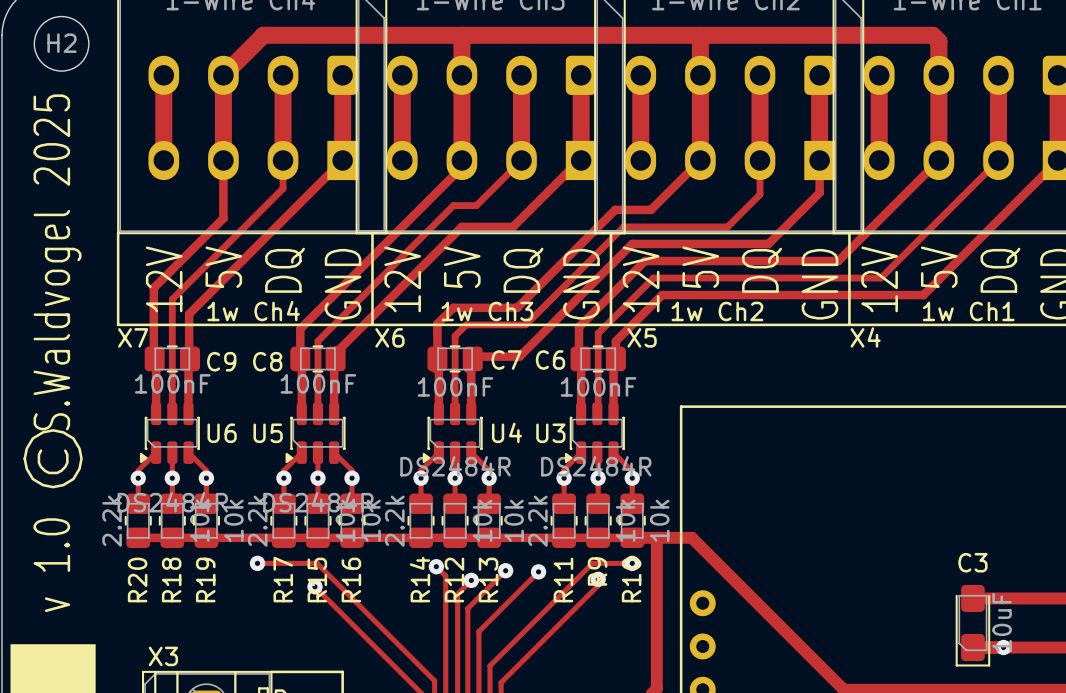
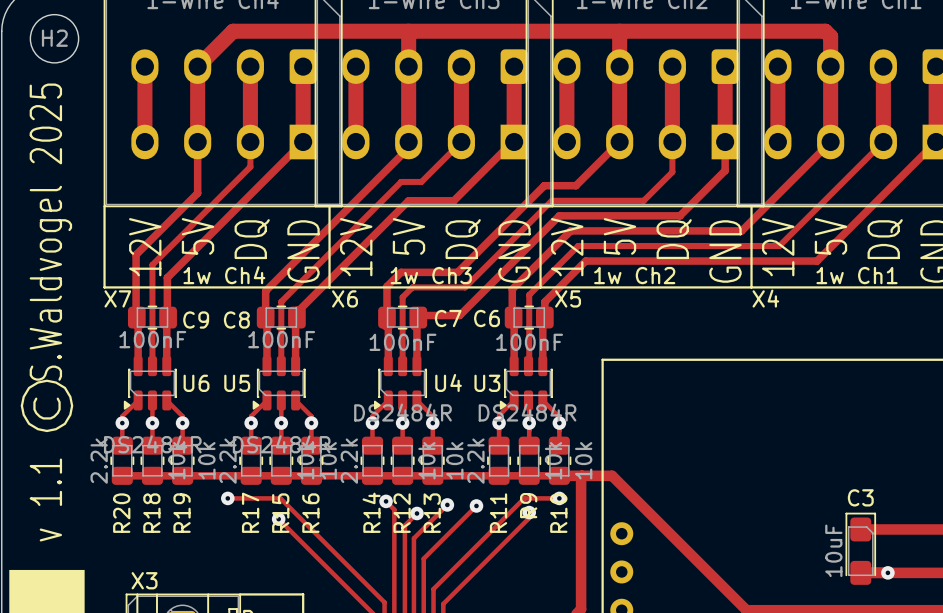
text: v 1.0 (51, 565) -> v 1.1 (45, 500)
C3 rotation: 0° (972, 625) -> 180° (860, 548)

